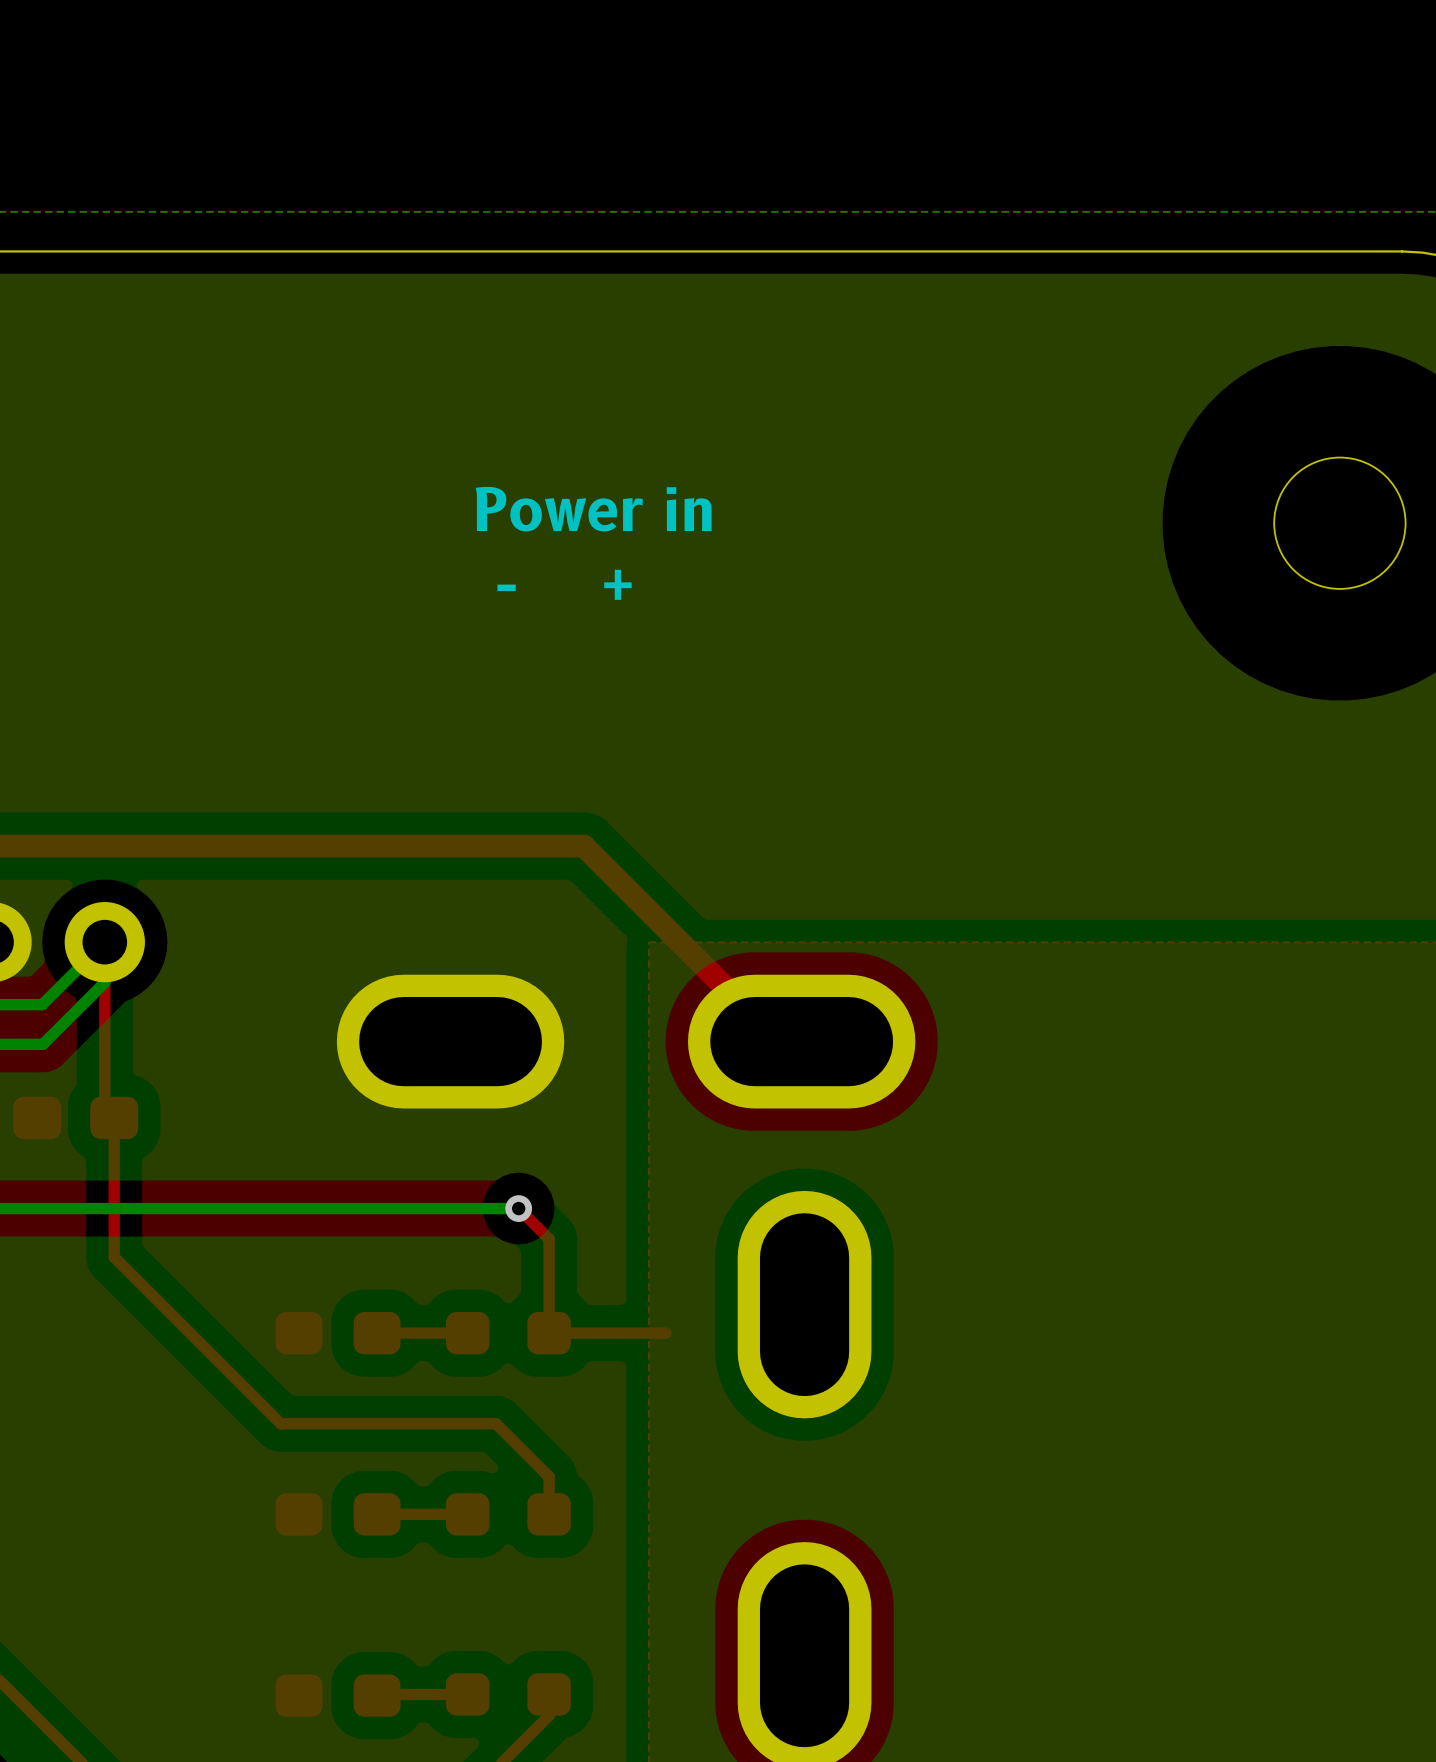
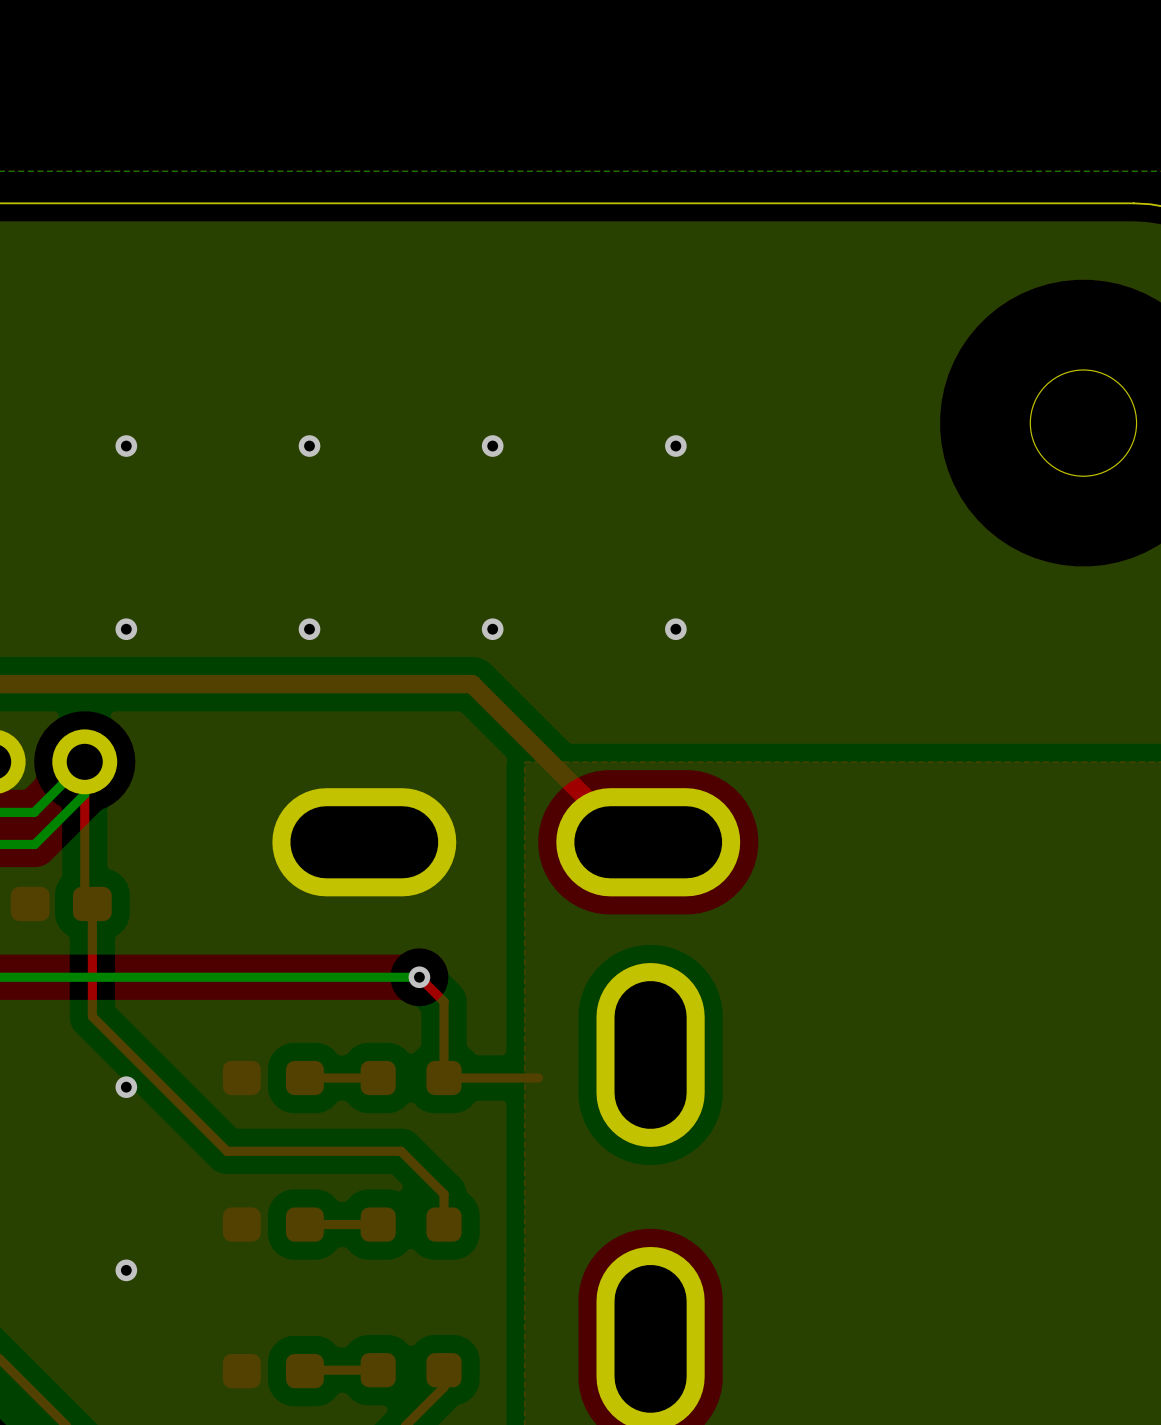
text: Power in (593, 509) -> none
via: none -> (126, 446)
via: none -> (309, 446)
via: none -> (492, 446)
via: none -> (675, 446)
text: - + (564, 584) -> none
via: none -> (126, 629)
via: none -> (309, 629)
via: none -> (492, 629)
via: none -> (675, 629)
via: none -> (126, 1087)
via: none -> (126, 1270)

